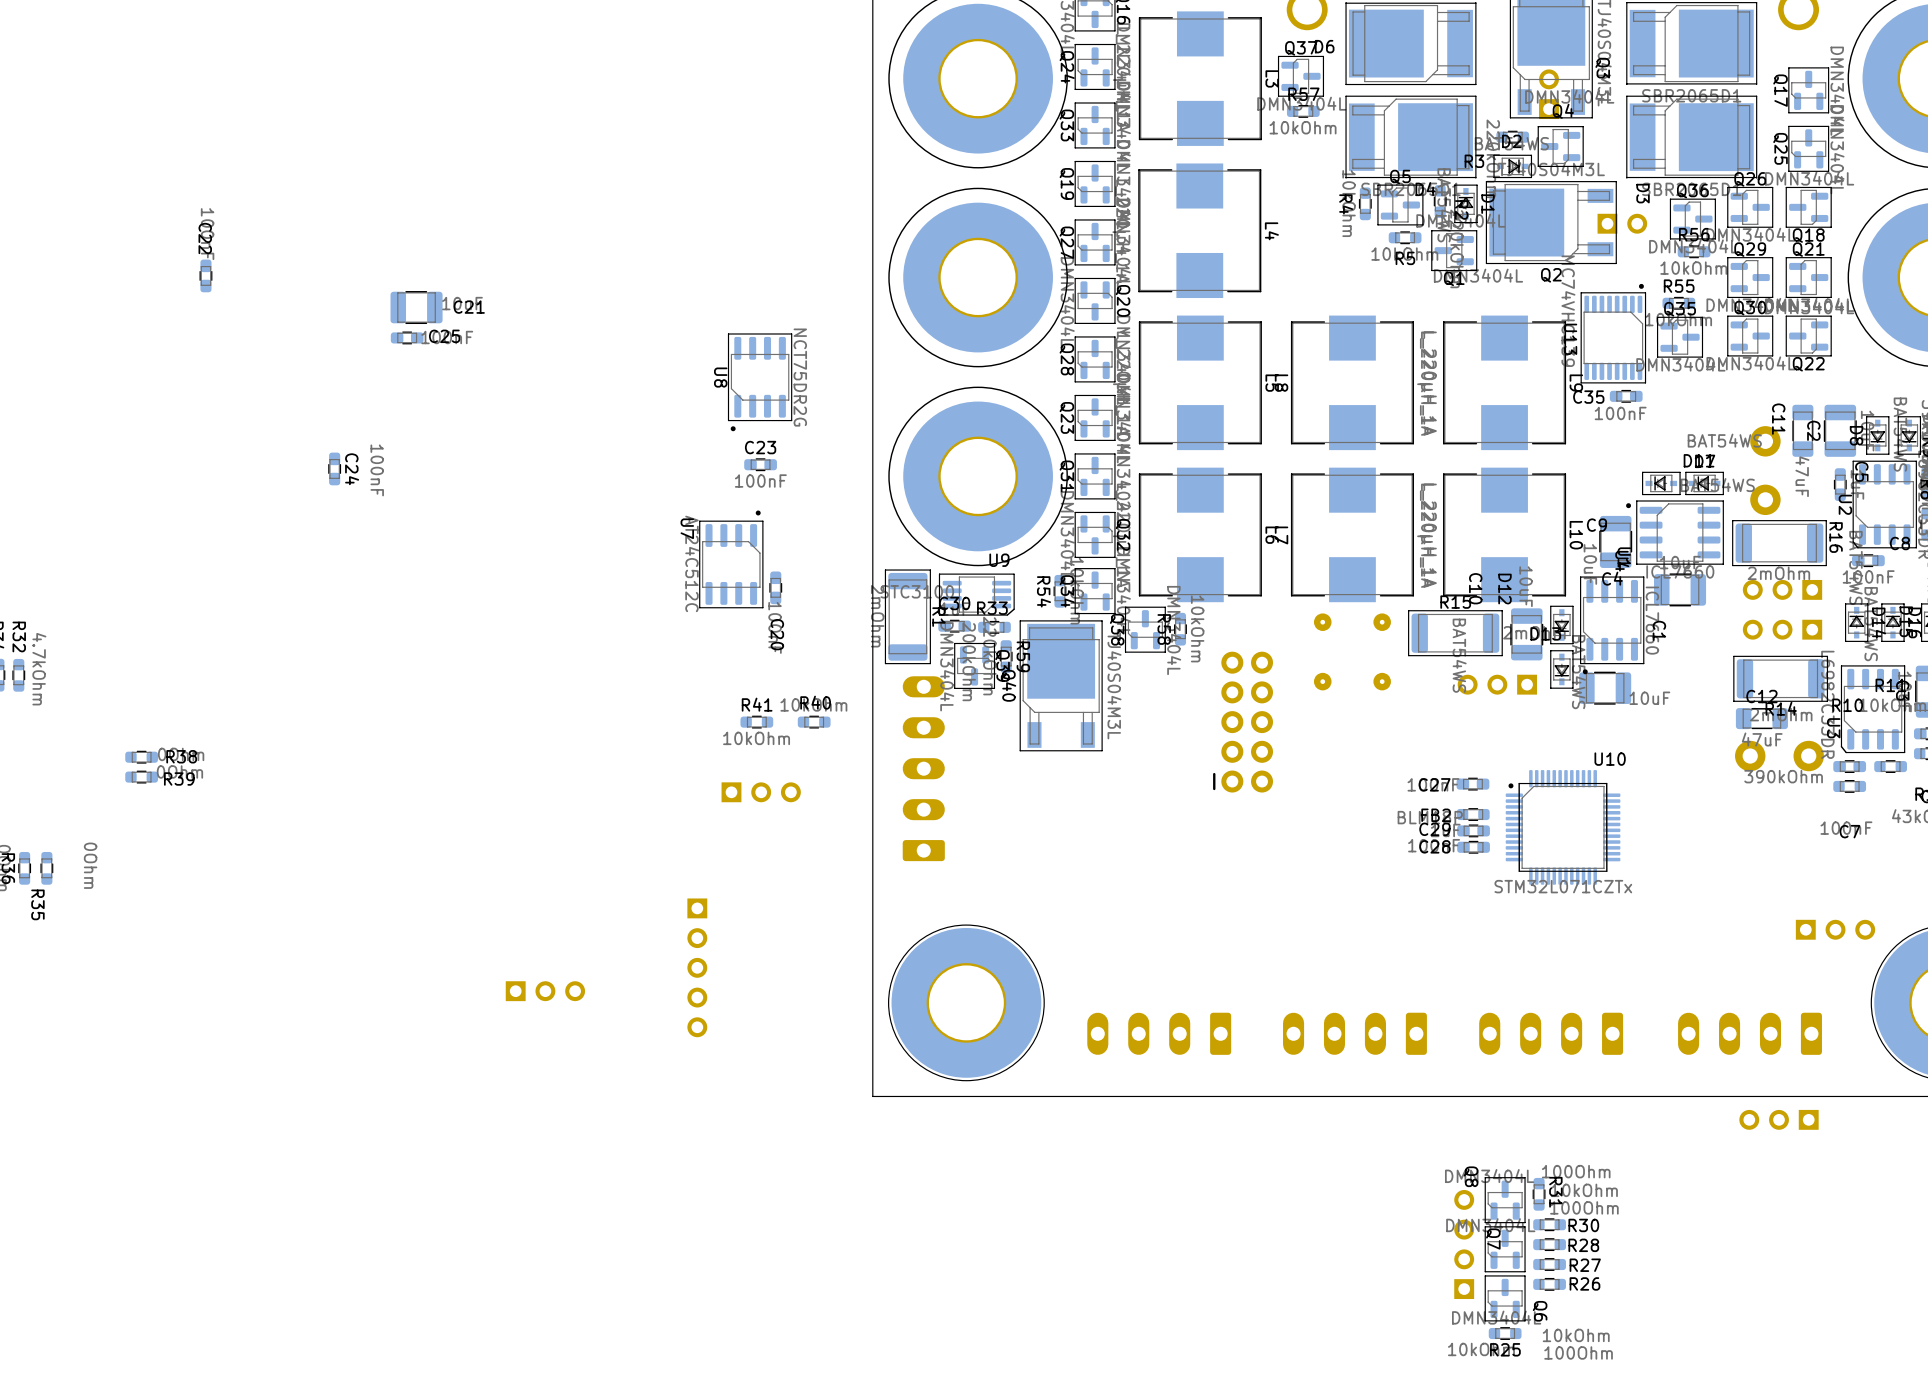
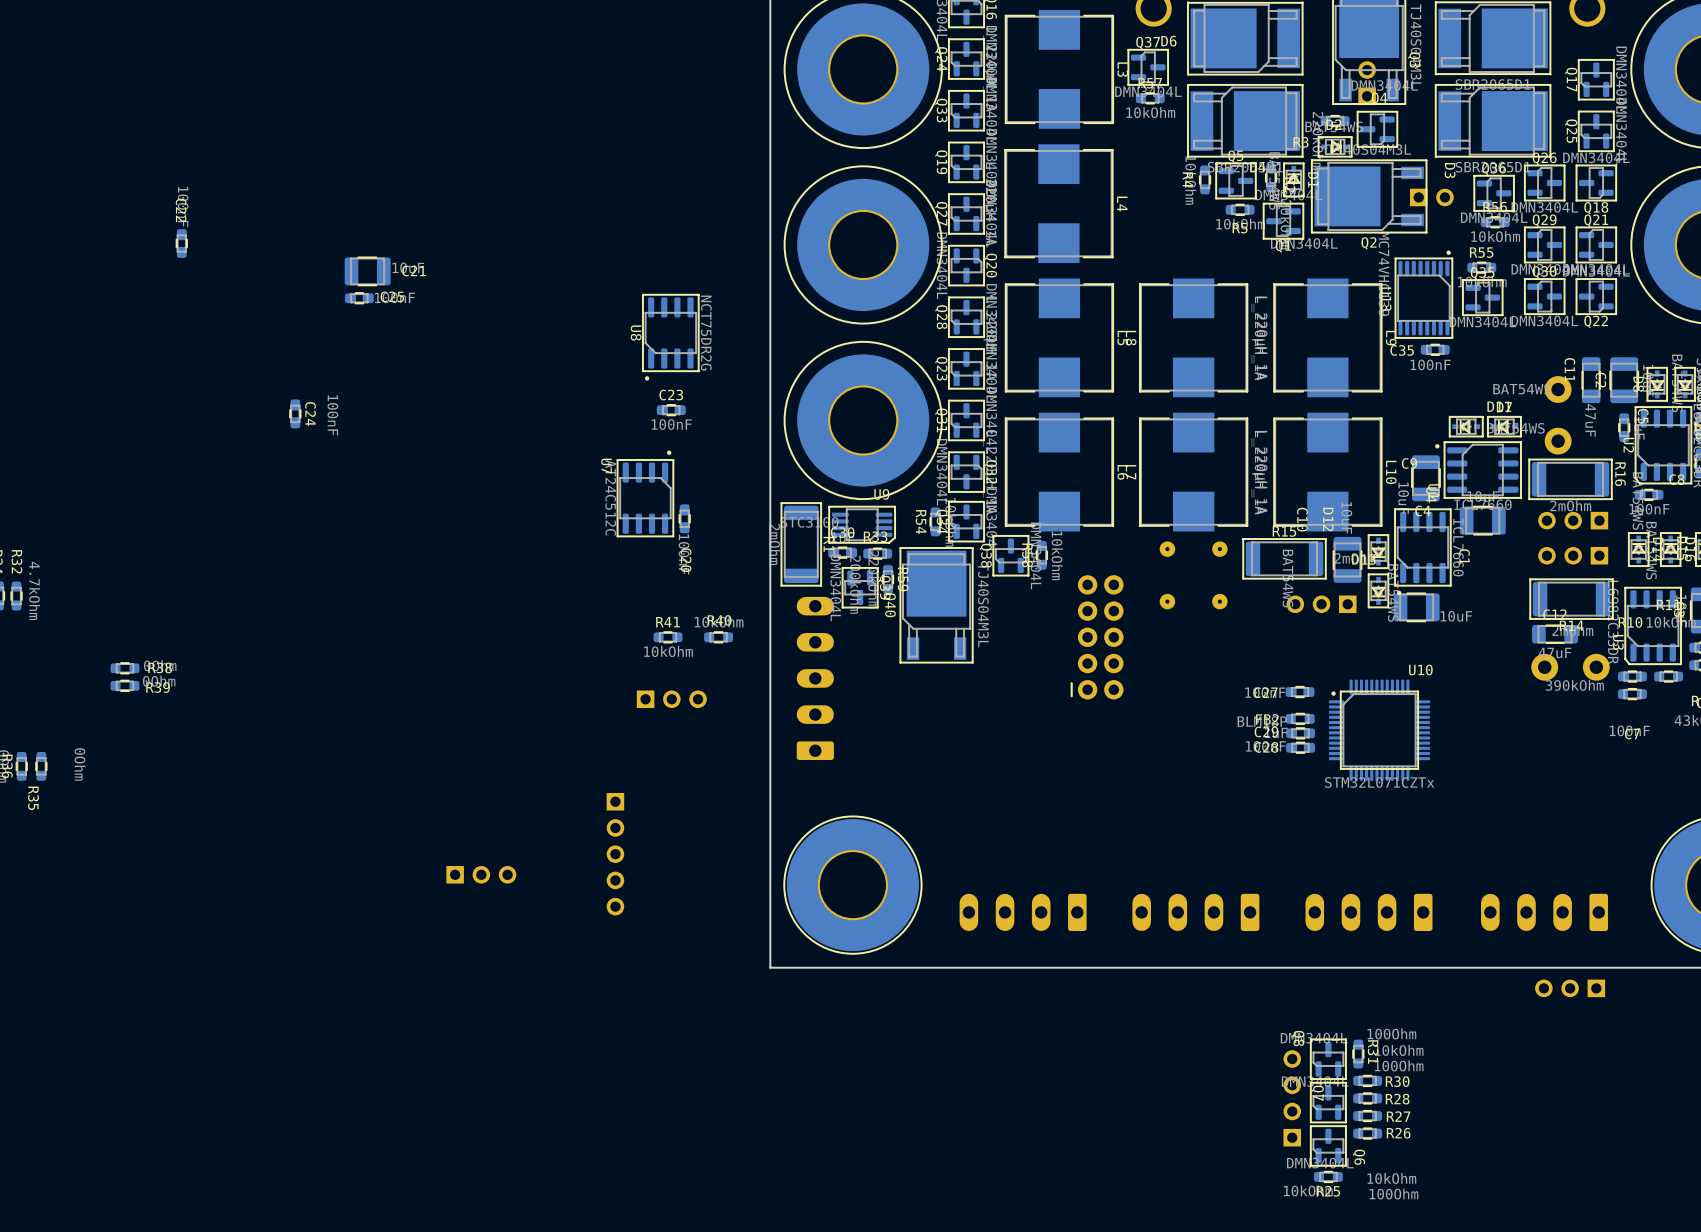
part: (1835, 929) -> none

